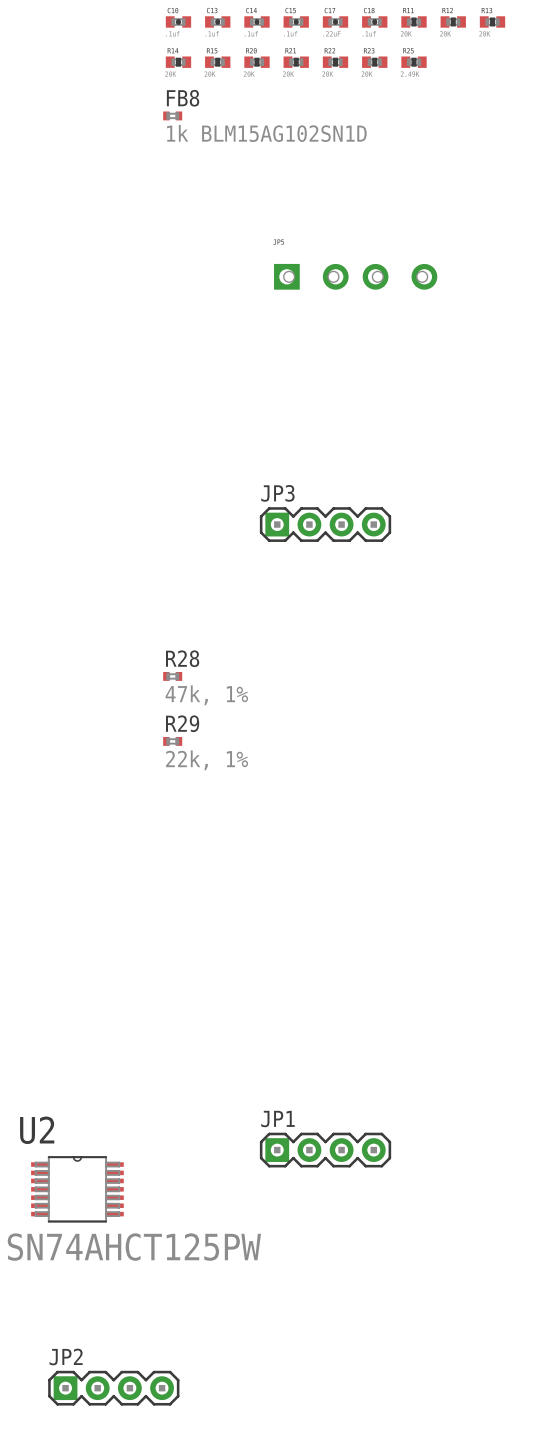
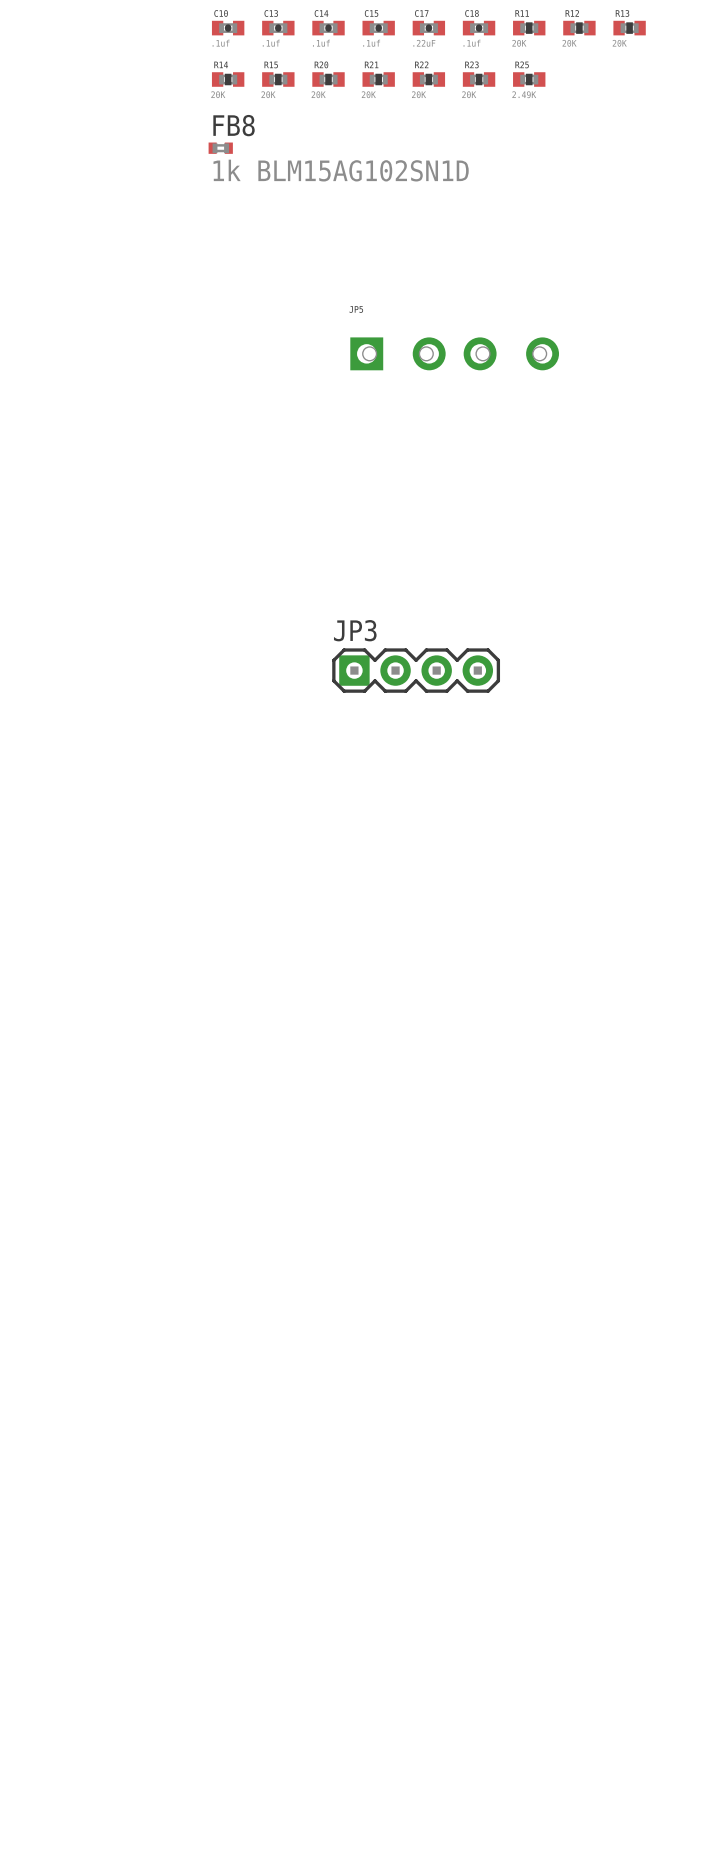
R28: 47k, 1% (172, 676) -> none
R29: 22k, 1% (172, 741) -> none
JP1: (325, 1150) -> none
U2: SN74AHCT125PW (77, 1189) -> none
JP2: (113, 1388) -> none

